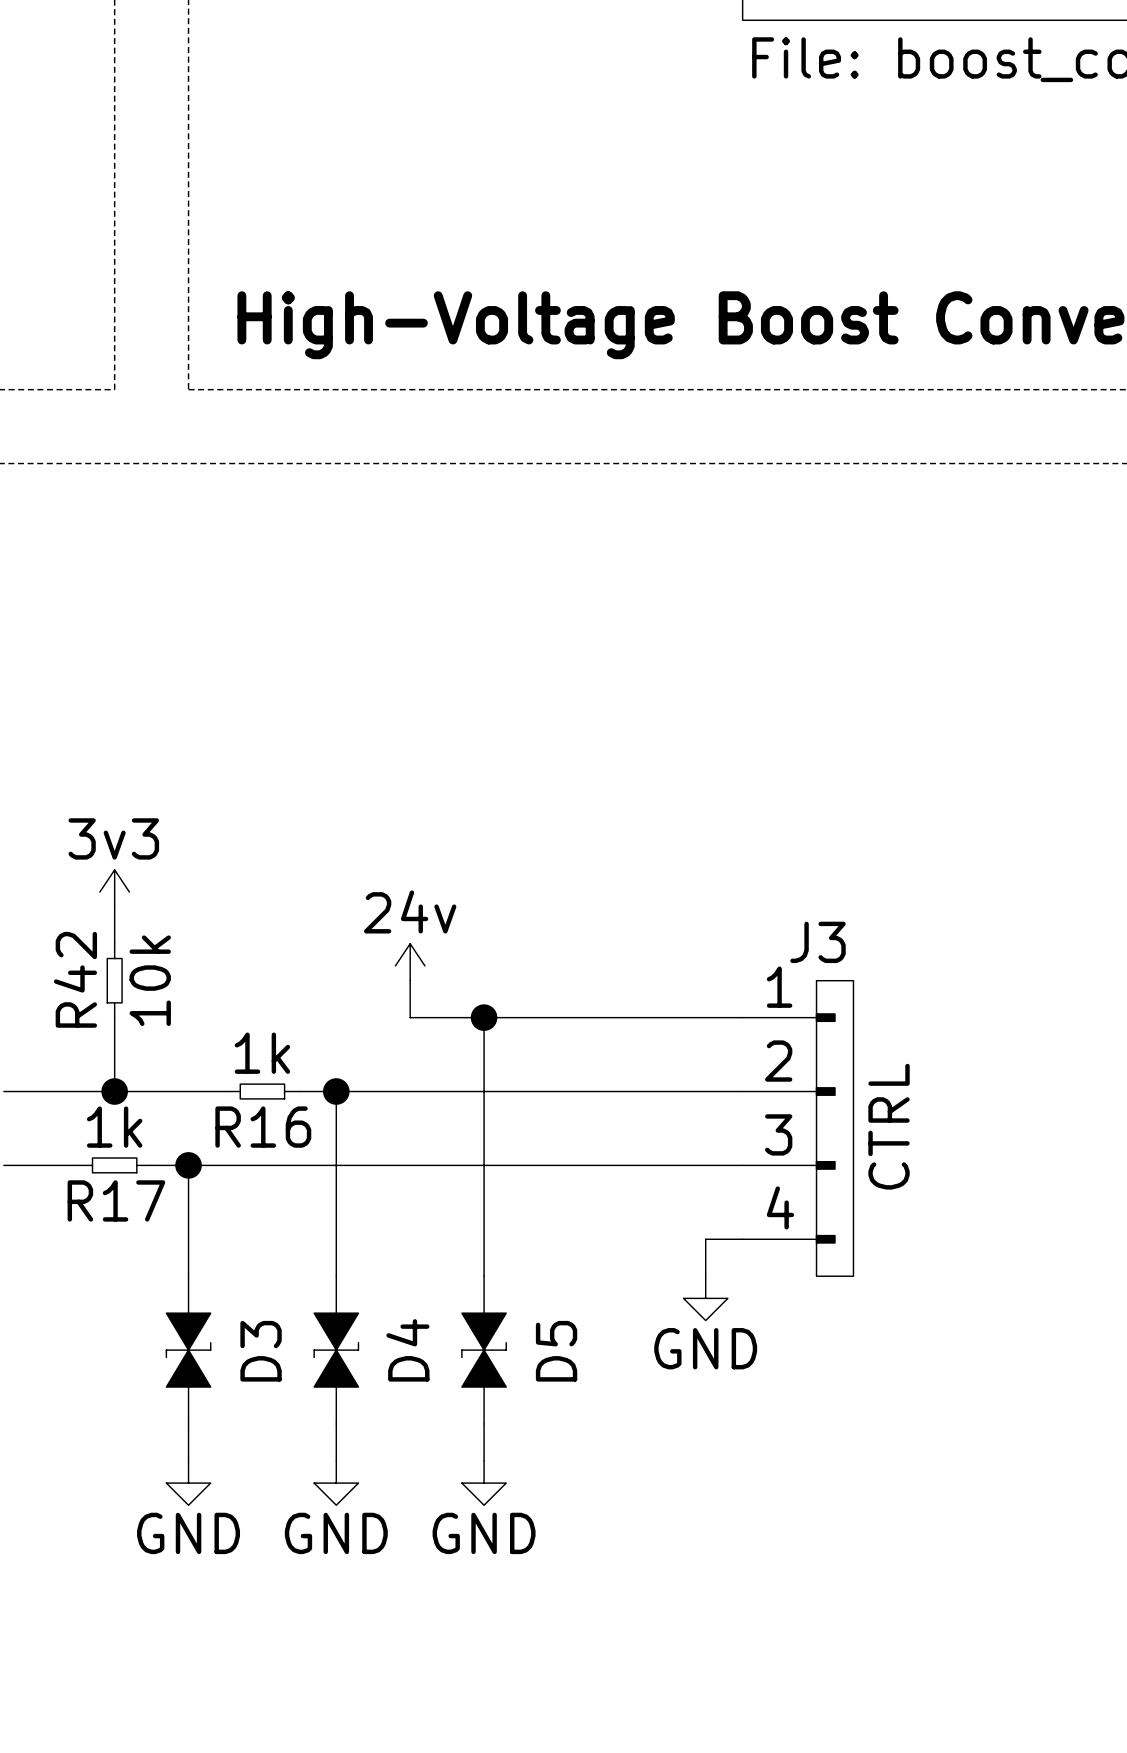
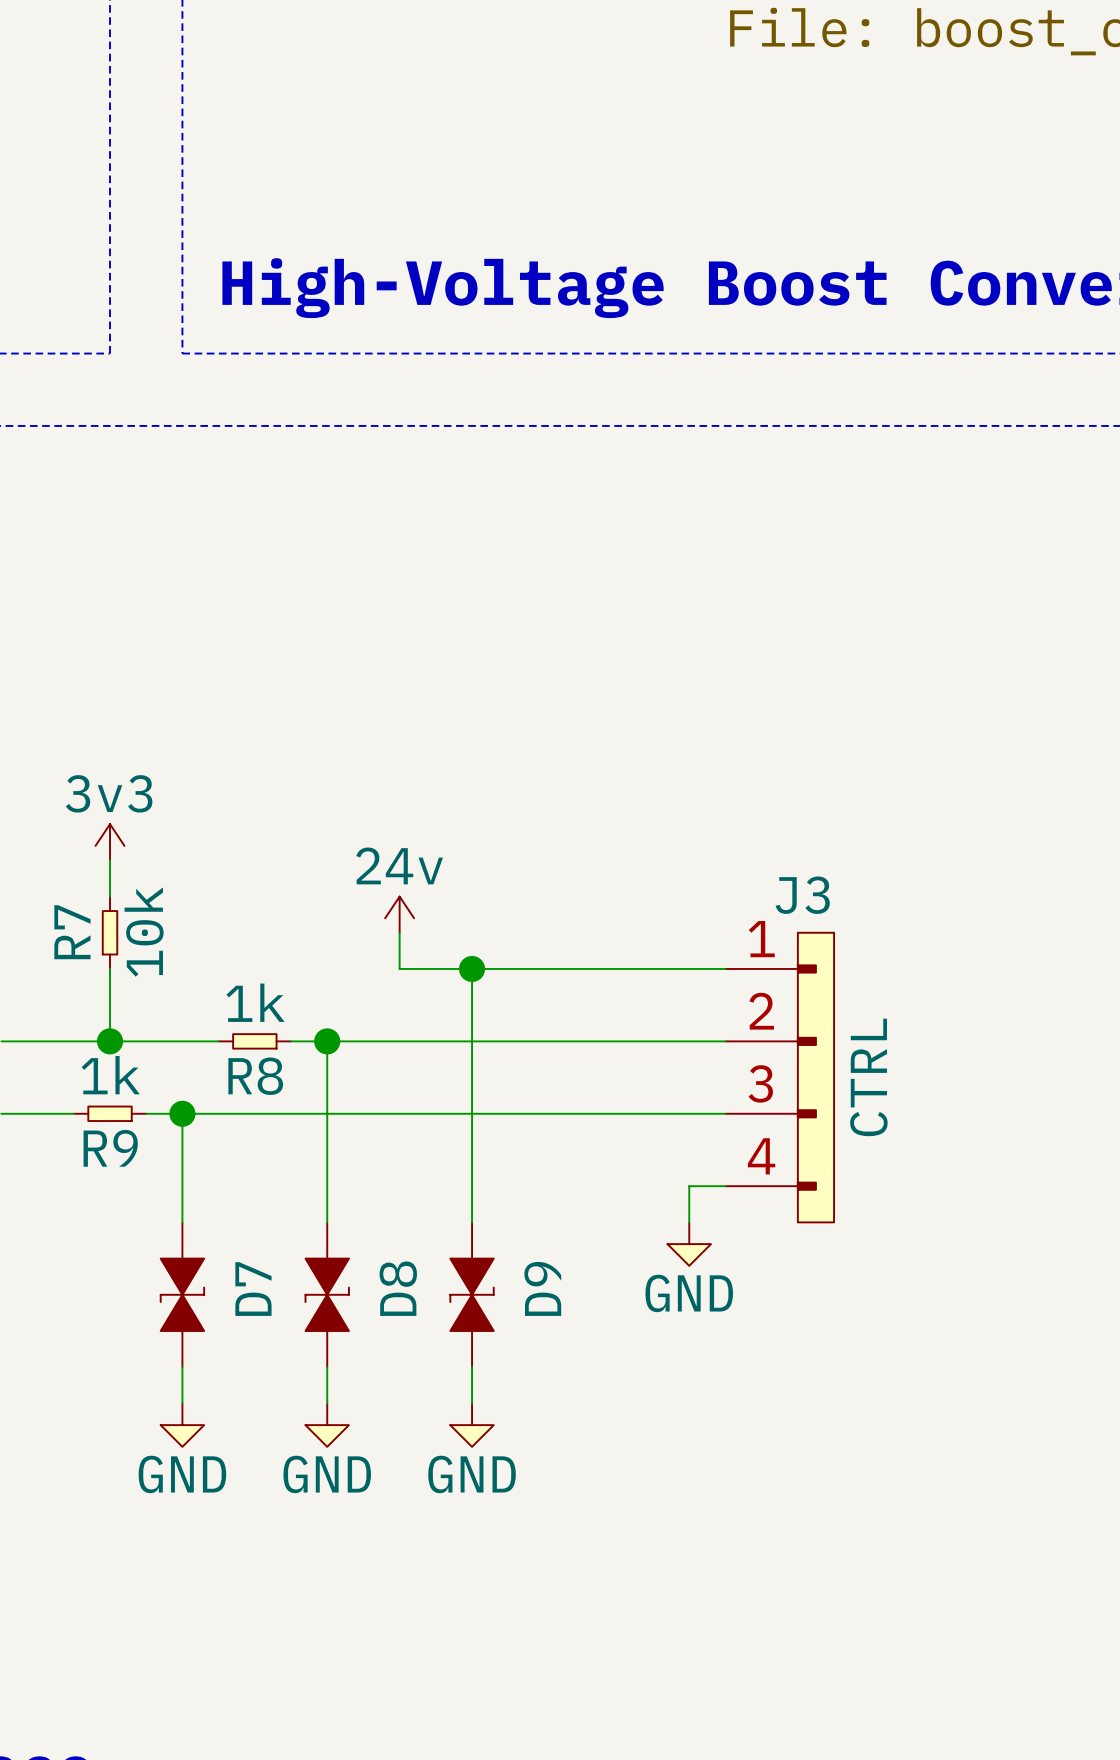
R42 name: R42 (75, 979) -> R7 (72, 932)
R16 name: R16 (263, 1127) -> R8 (255, 1076)
R17 name: R17 (116, 1200) -> R9 (110, 1148)
D4 name: D4 (407, 1350) -> D8 (398, 1288)
D3 name: D3 (261, 1351) -> D7 (253, 1289)
D5 name: D5 (556, 1351) -> D9 (542, 1288)

